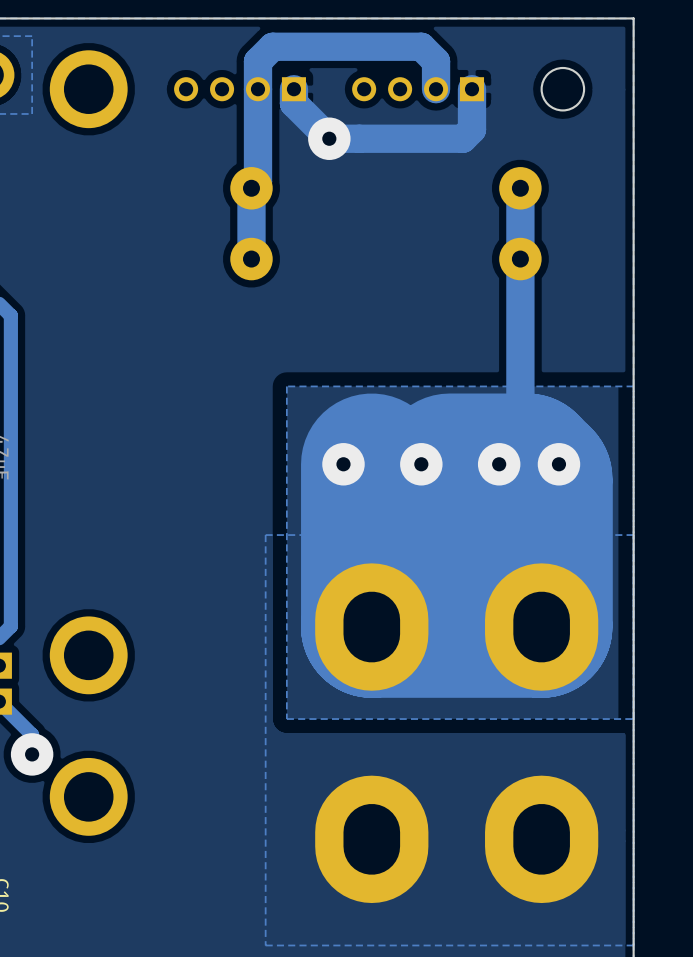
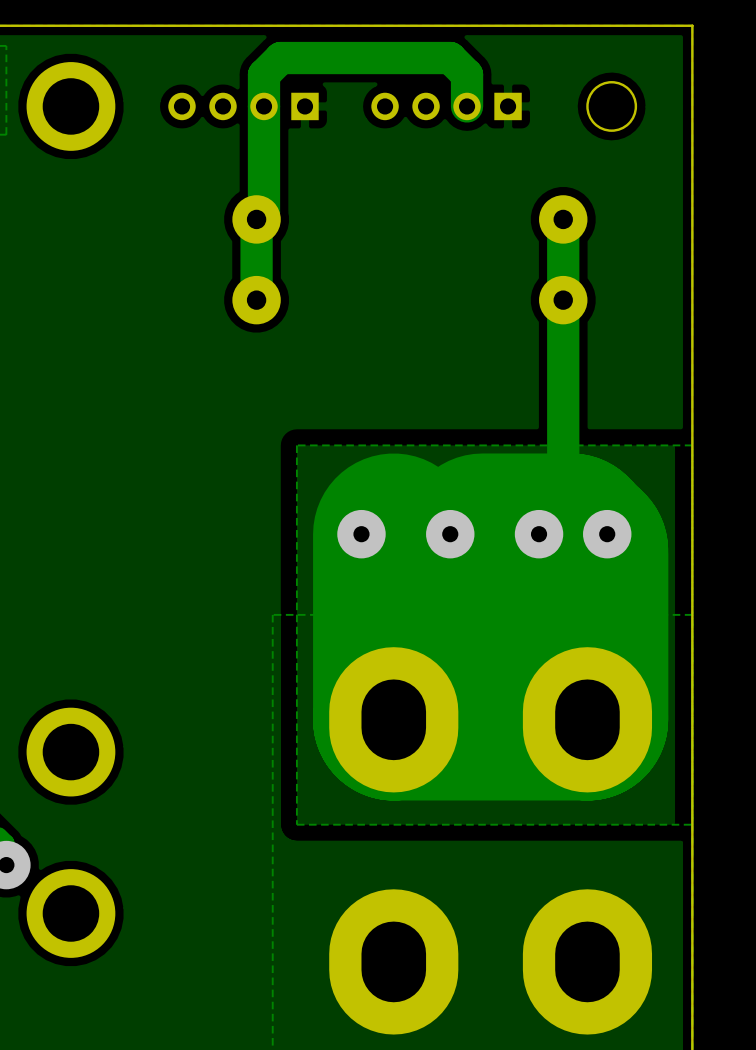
track: (472, 89) (472, 129) (462, 138) (329, 138) (293, 103) (293, 89) -> none
via: (329, 138) -> none

